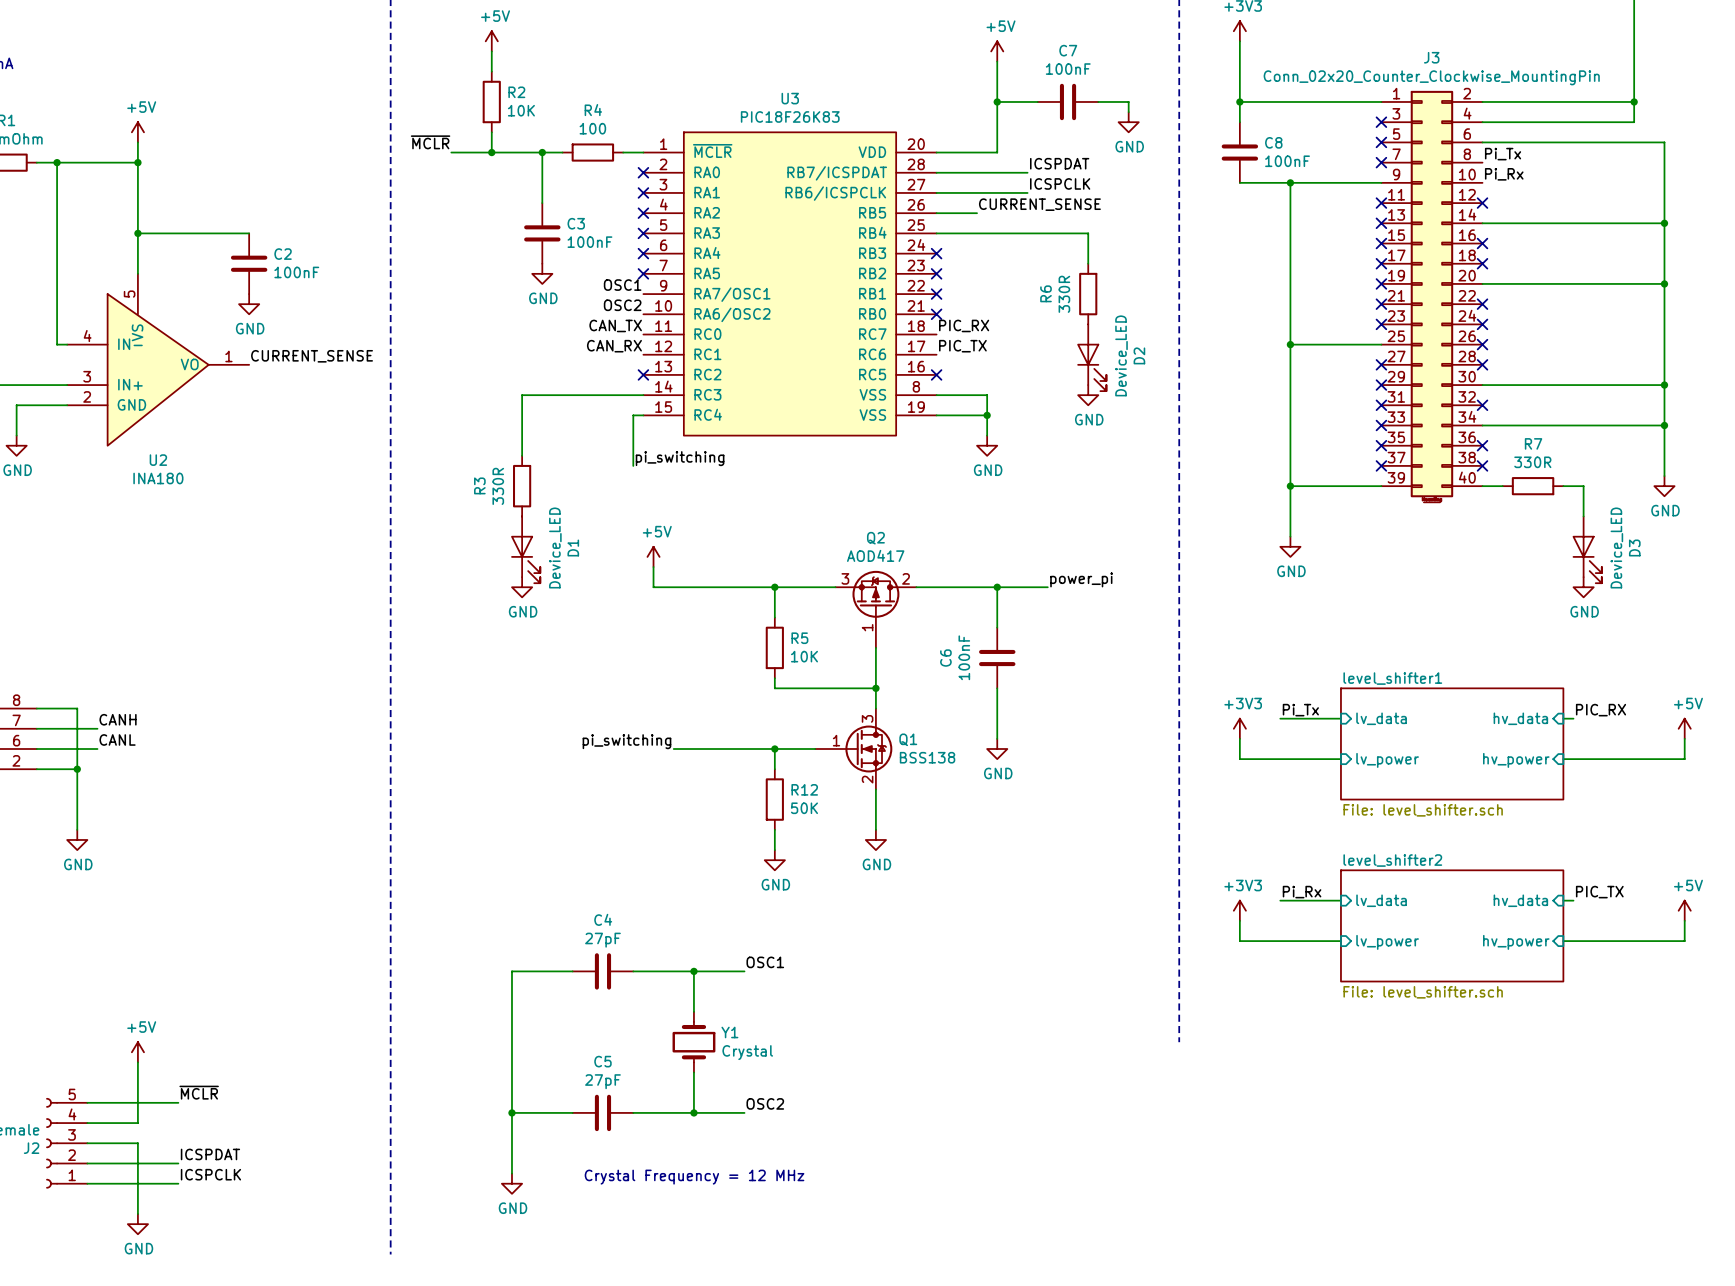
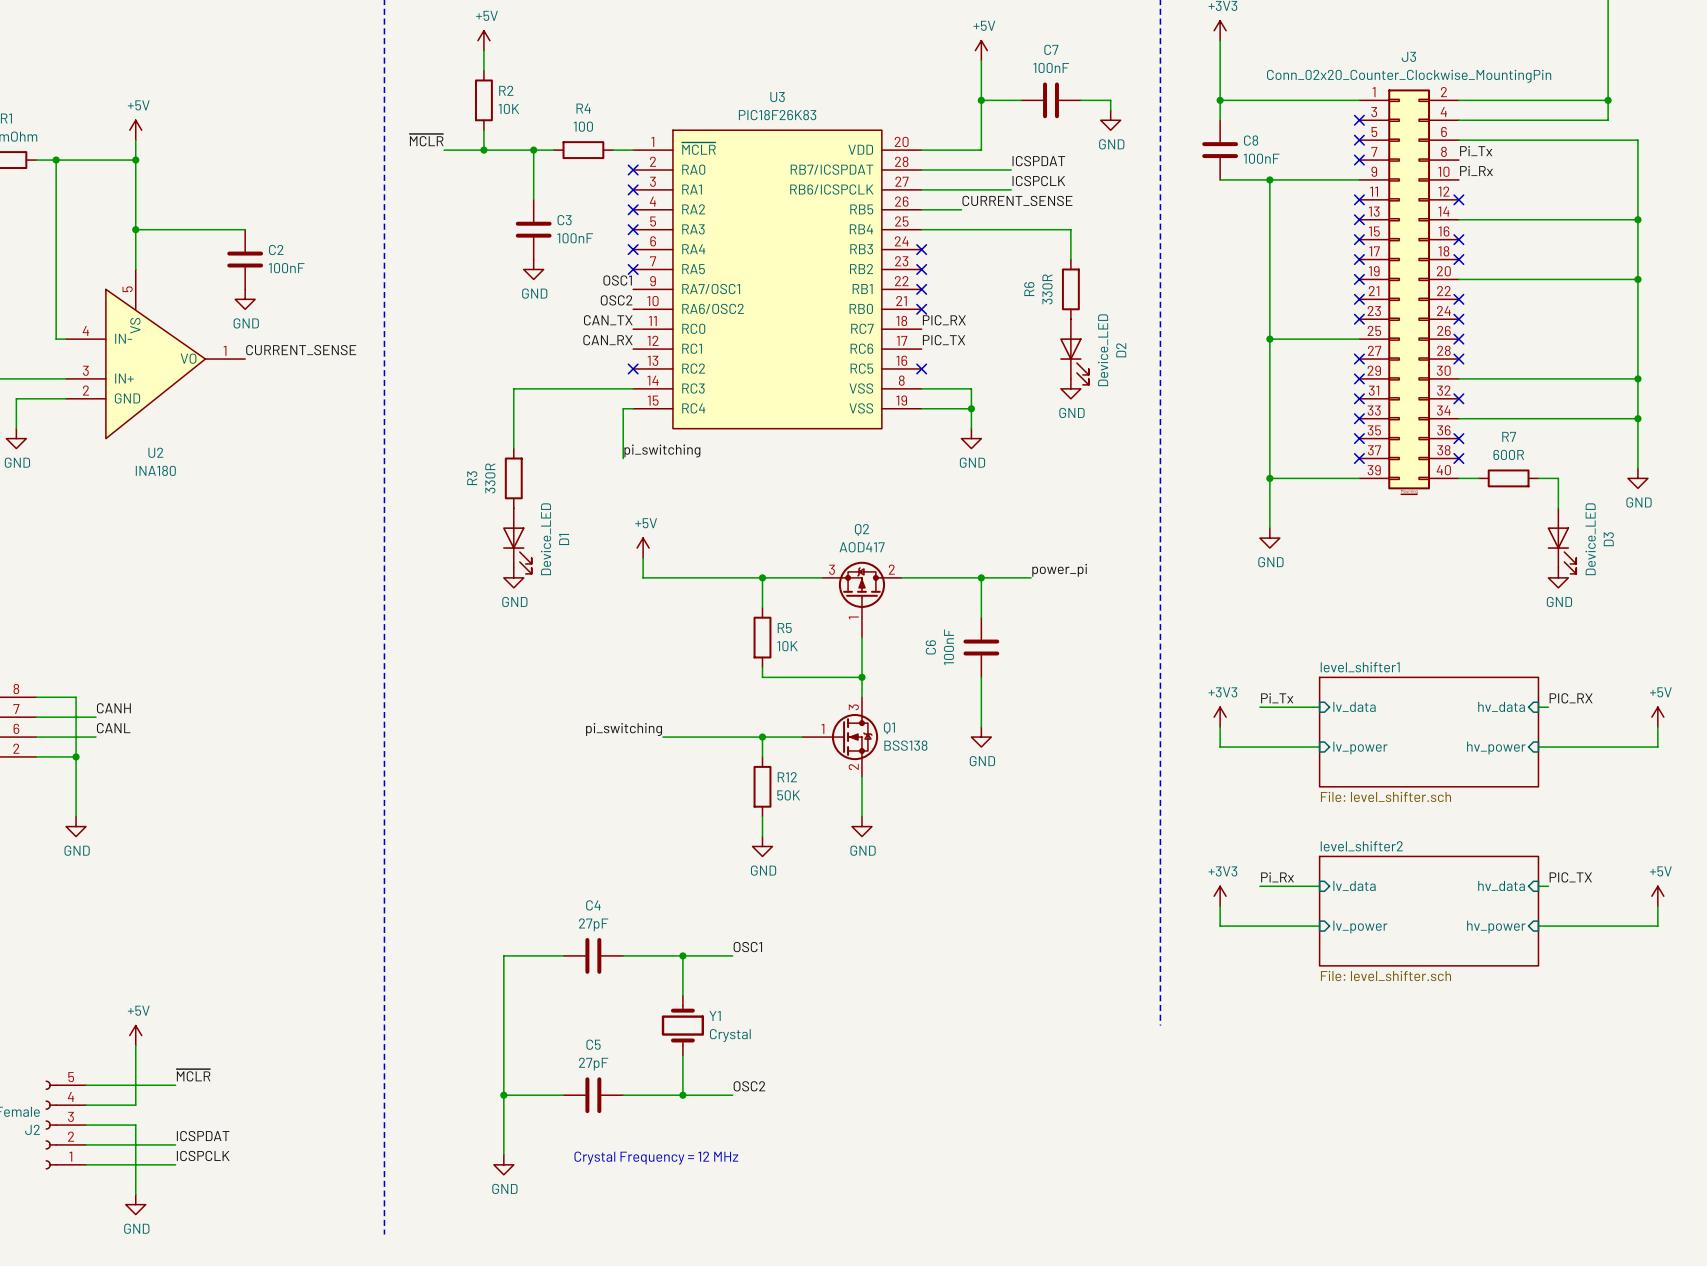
R7 value: 330R (1532, 462) -> 600R (1508, 454)

